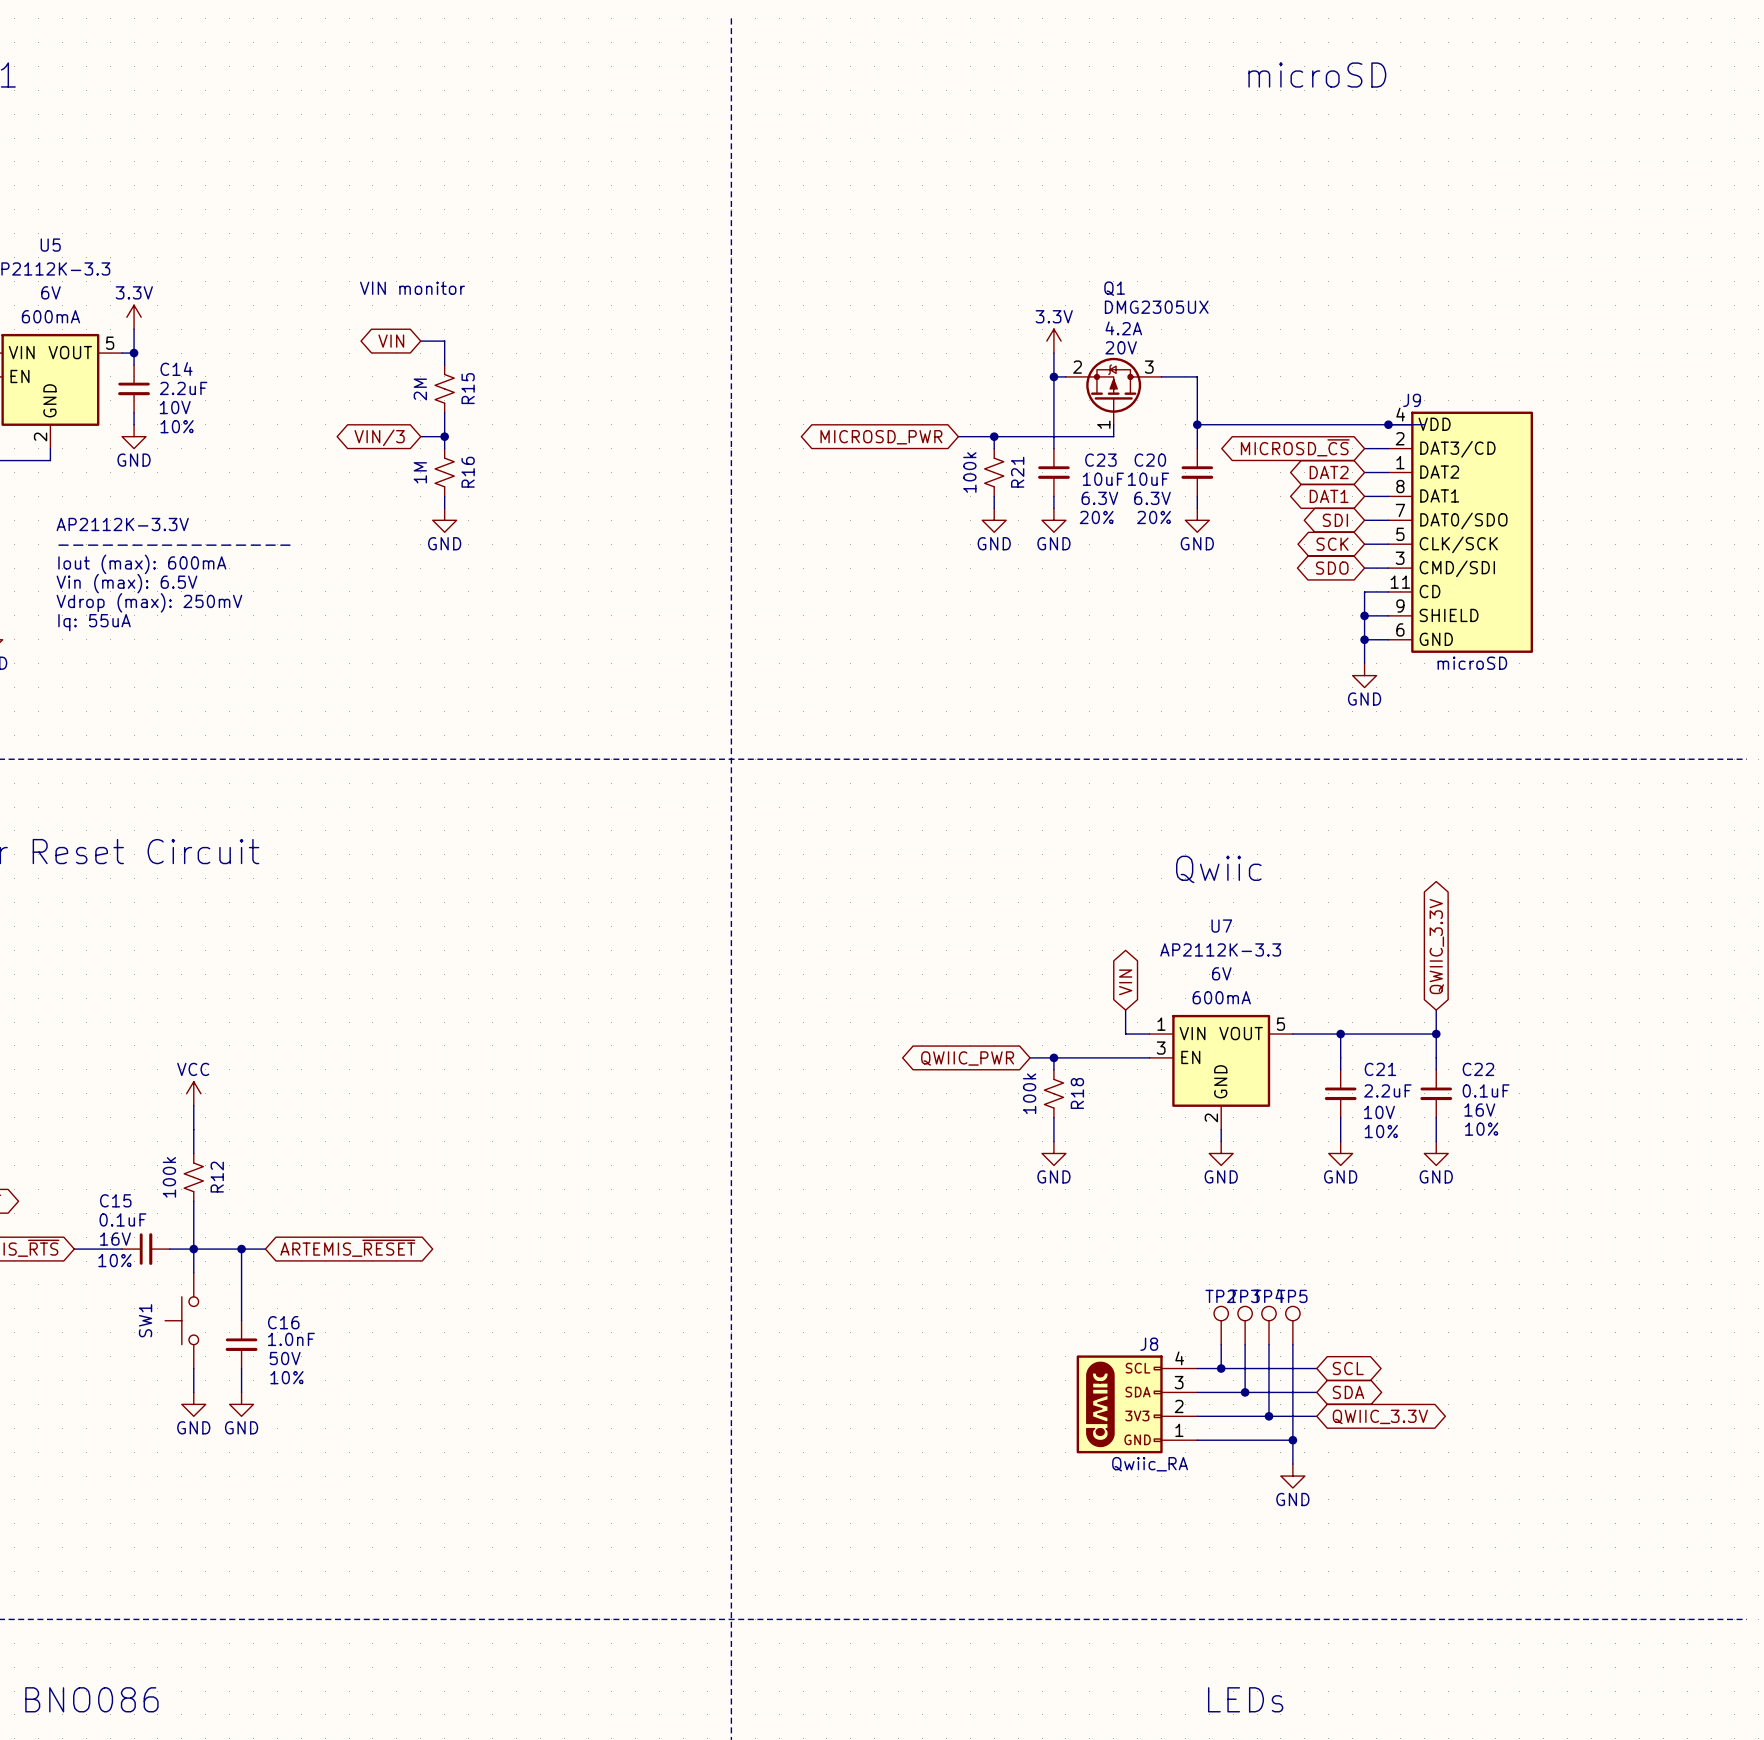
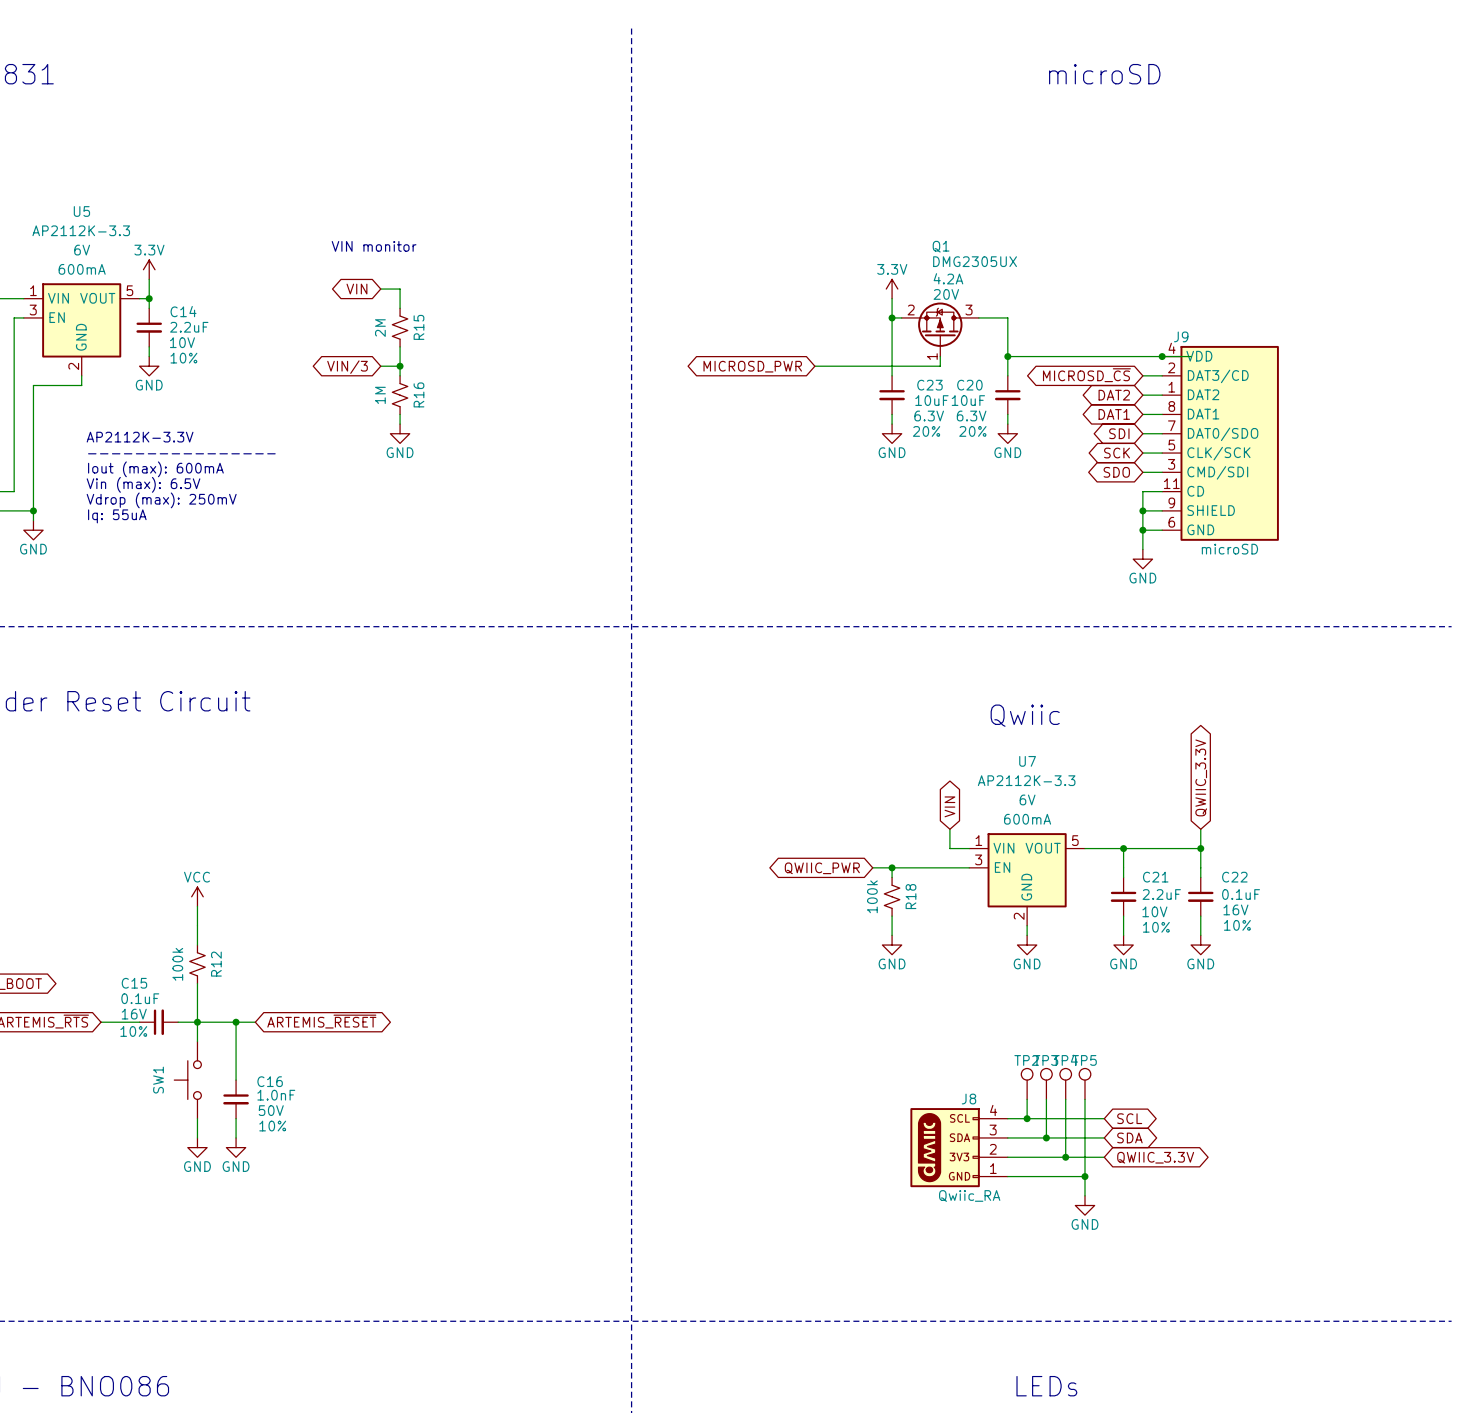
wire: (994, 436) (994, 448) -> none
junction: (994, 436) -> none
R21: 100k (994, 472) -> none
wire: (994, 496) (994, 508) -> none
power symbol: GND (994, 520) -> none

